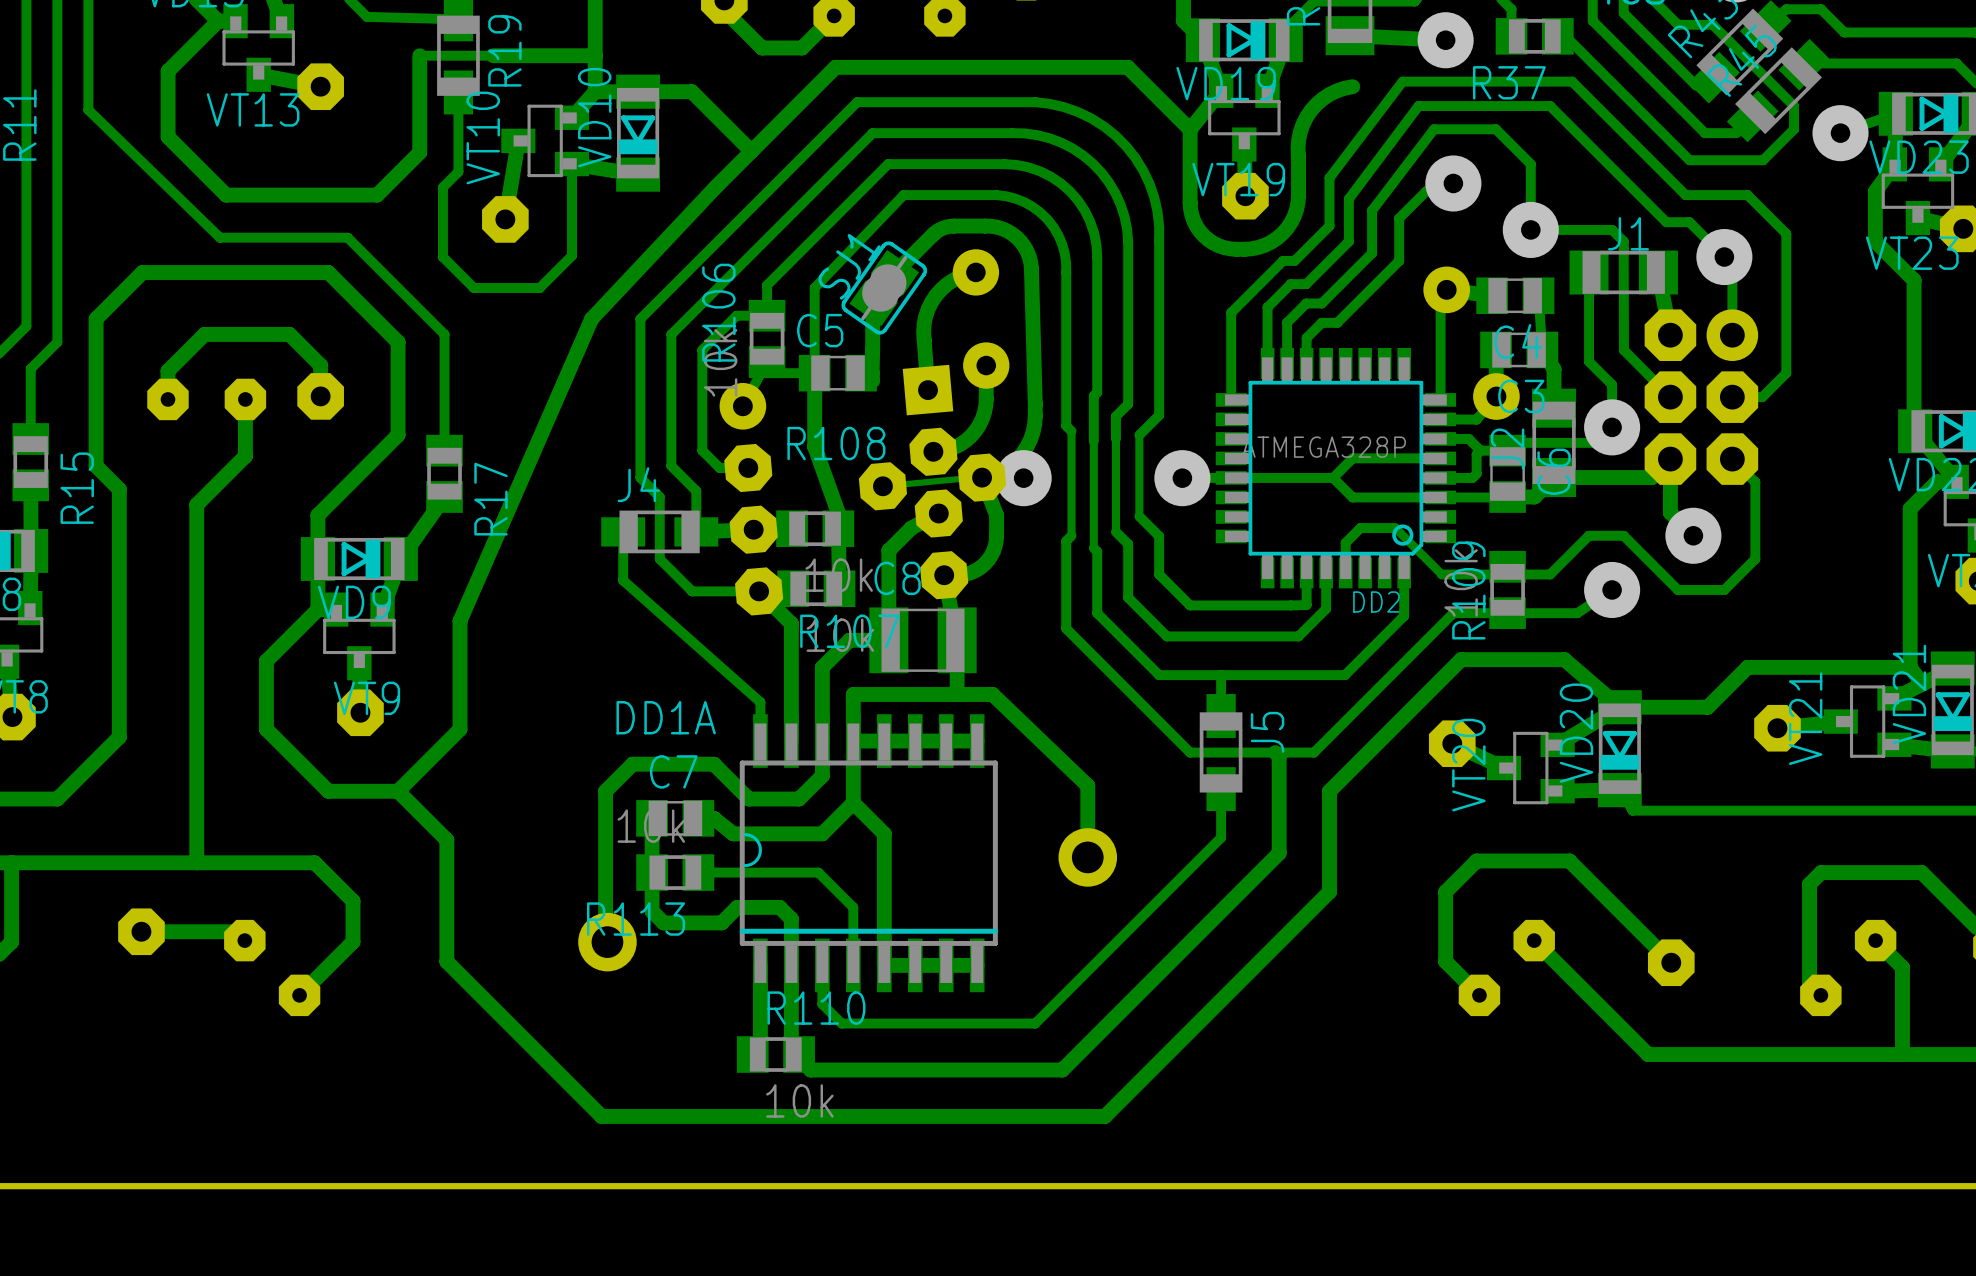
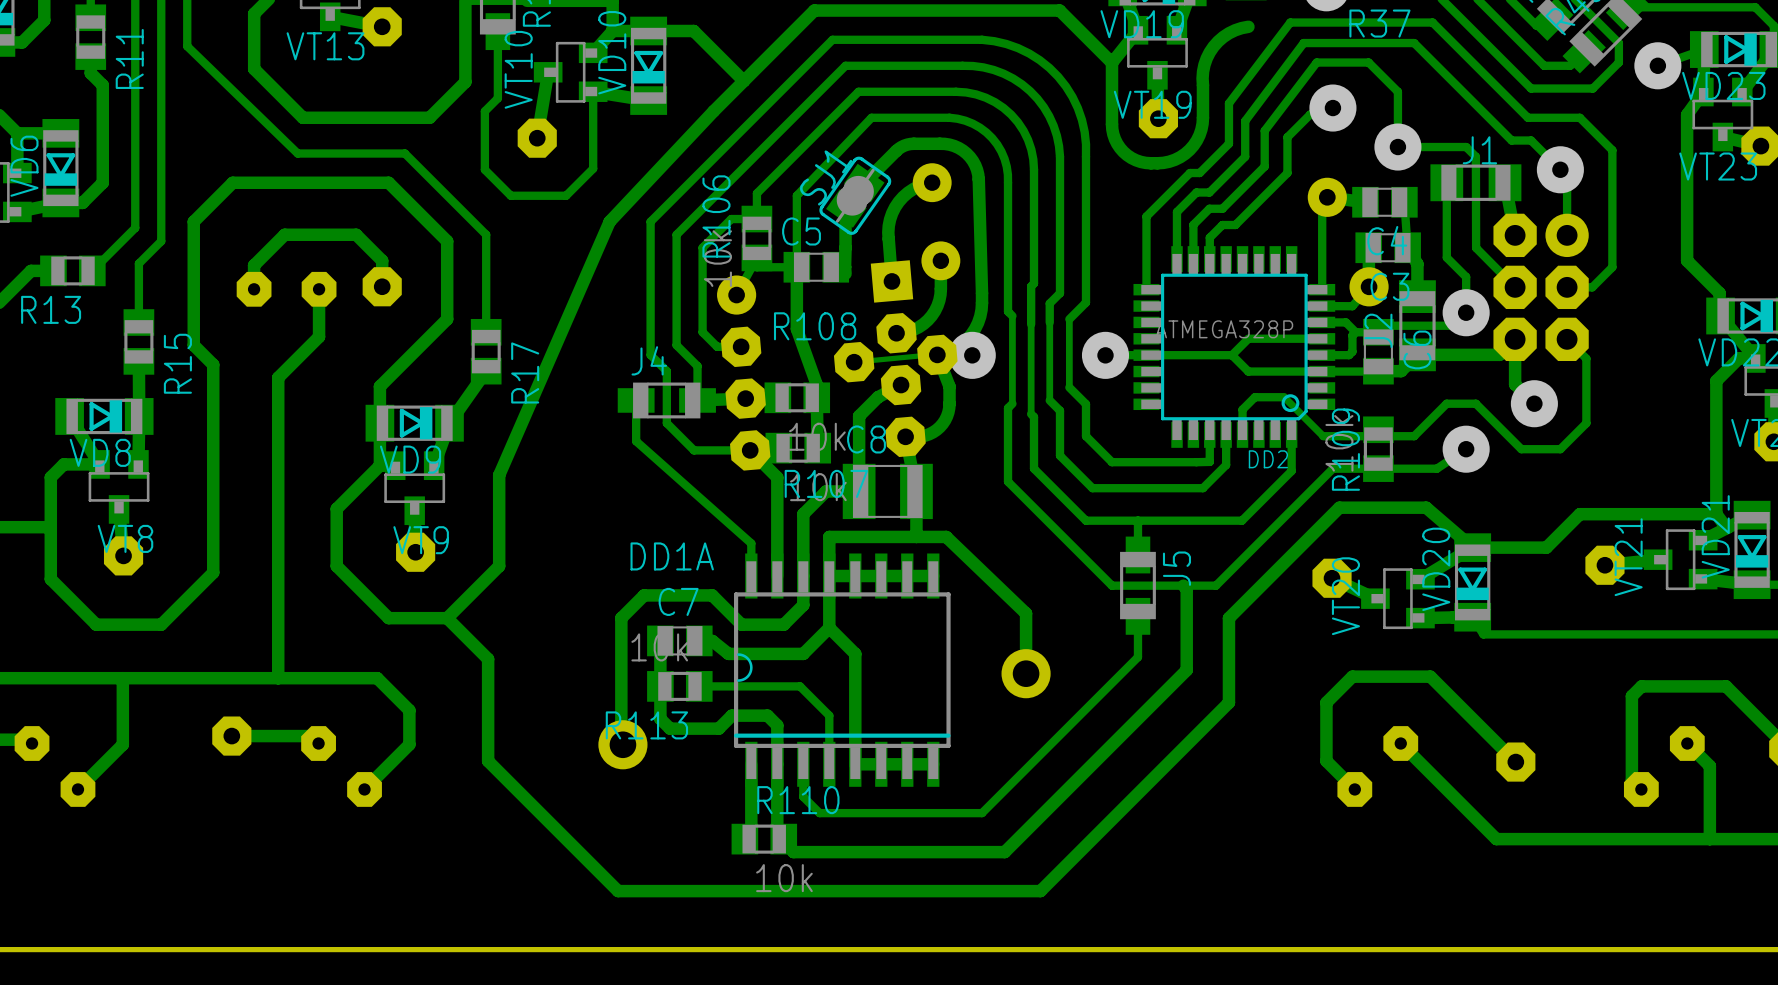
track: (1875, 241) (1914, 280) (1914, 404) -> (1687, 156) (1687, 260) (1719, 293)

